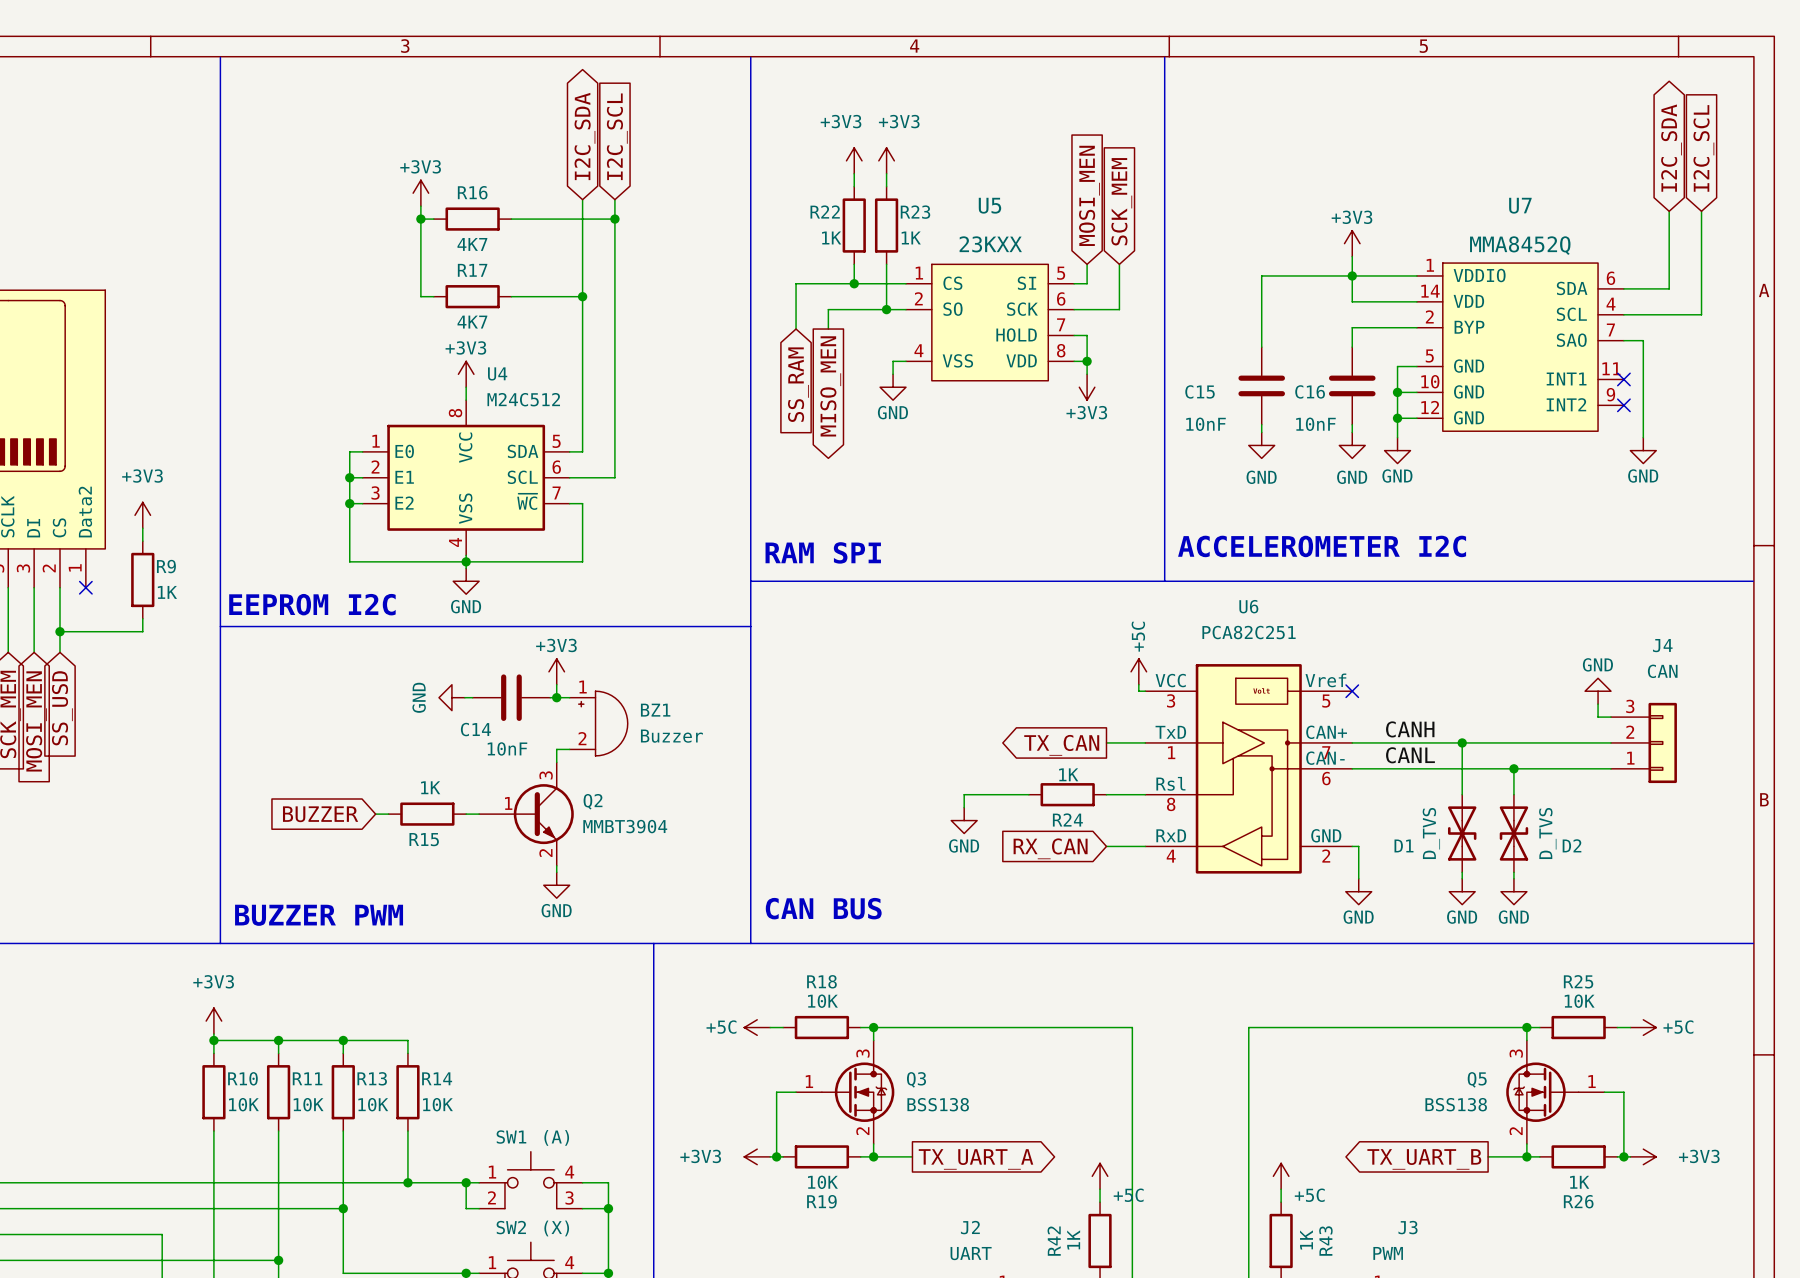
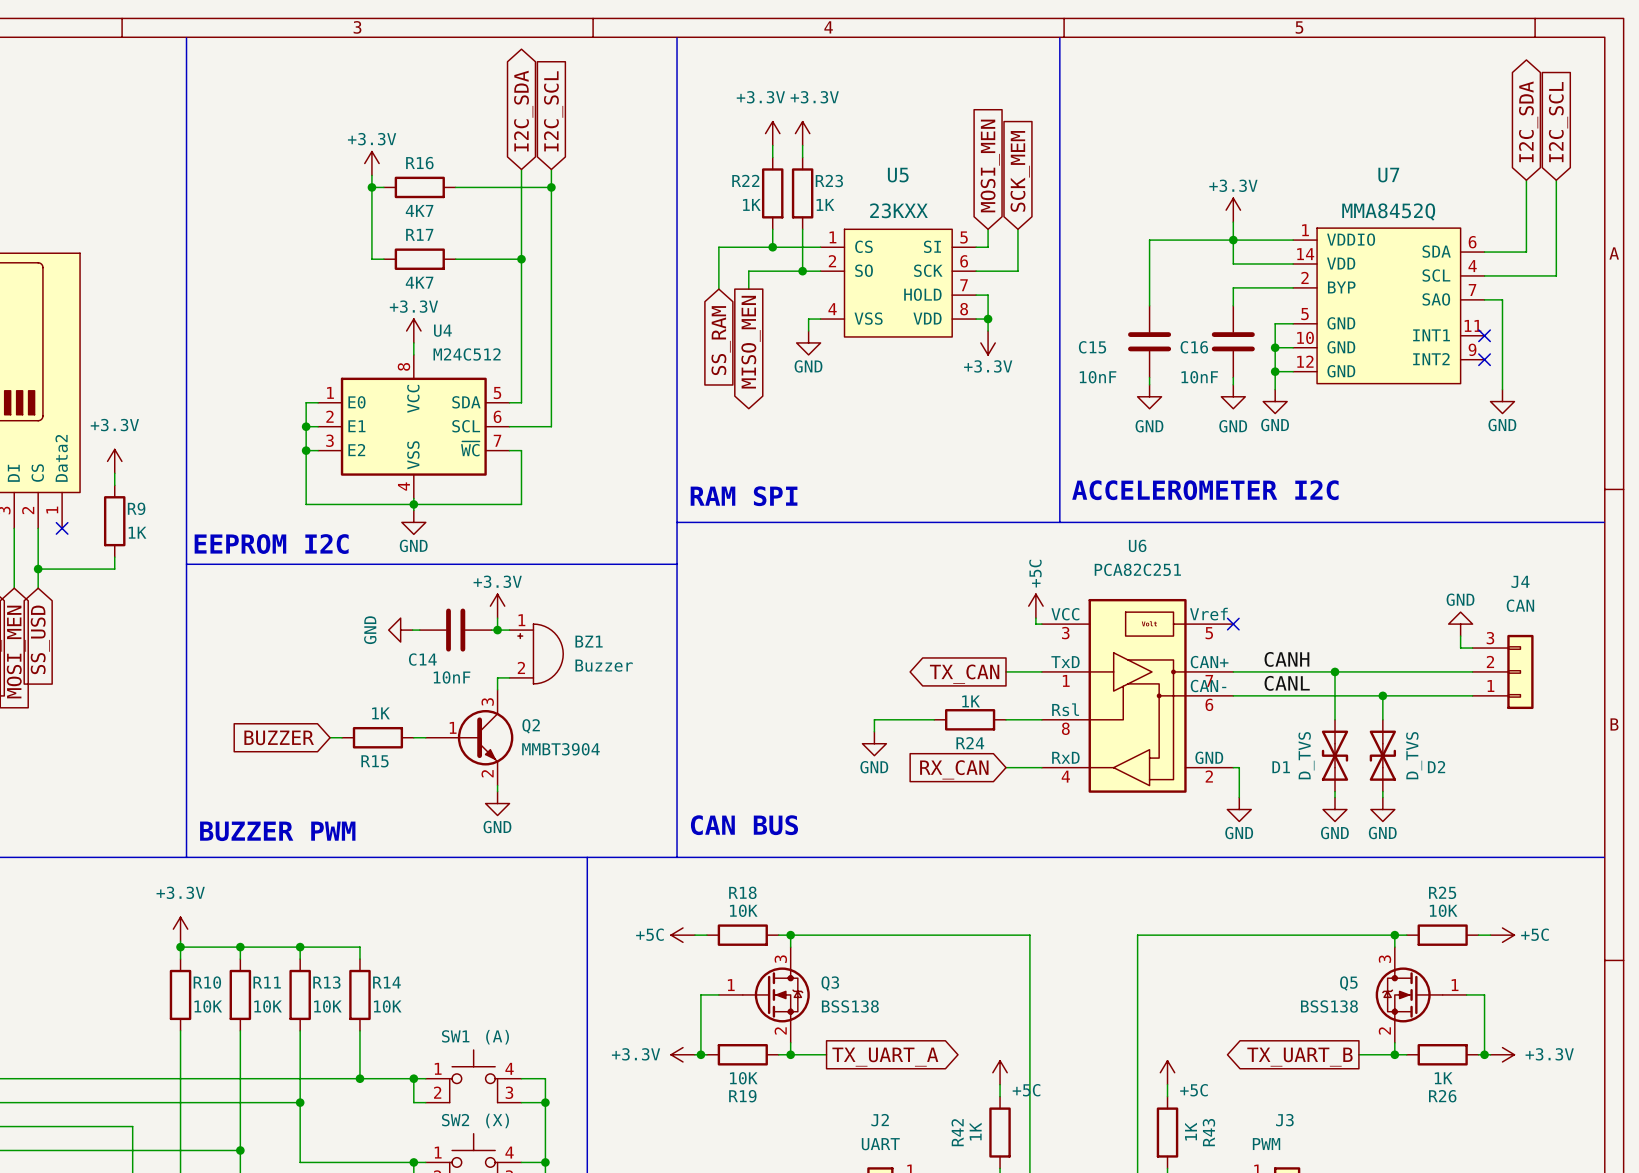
power symbol: +3V3 (854, 160) -> +3.3V (772, 133)
power symbol: +3V3 (886, 160) -> +3.3V (802, 133)
power symbol: +3V3 (420, 193) -> +3.3V (371, 163)
power symbol: +3V3 (1352, 243) -> +3.3V (1233, 210)
power symbol: +3V3 (466, 374) -> +3.3V (413, 330)
power symbol: +3V3 (1087, 387) -> +3.3V (988, 342)
power symbol: +3V3 (142, 515) -> +3.3V (114, 461)
power symbol: +3V3 (556, 671) -> +3.3V (497, 606)
power symbol: +3V3 (213, 1021) -> +3.3V (180, 929)
power symbol: +3V3 (757, 1156) -> +3.3V (682, 1054)
power symbol: +3V3 (1643, 1156) -> +3.3V (1502, 1054)

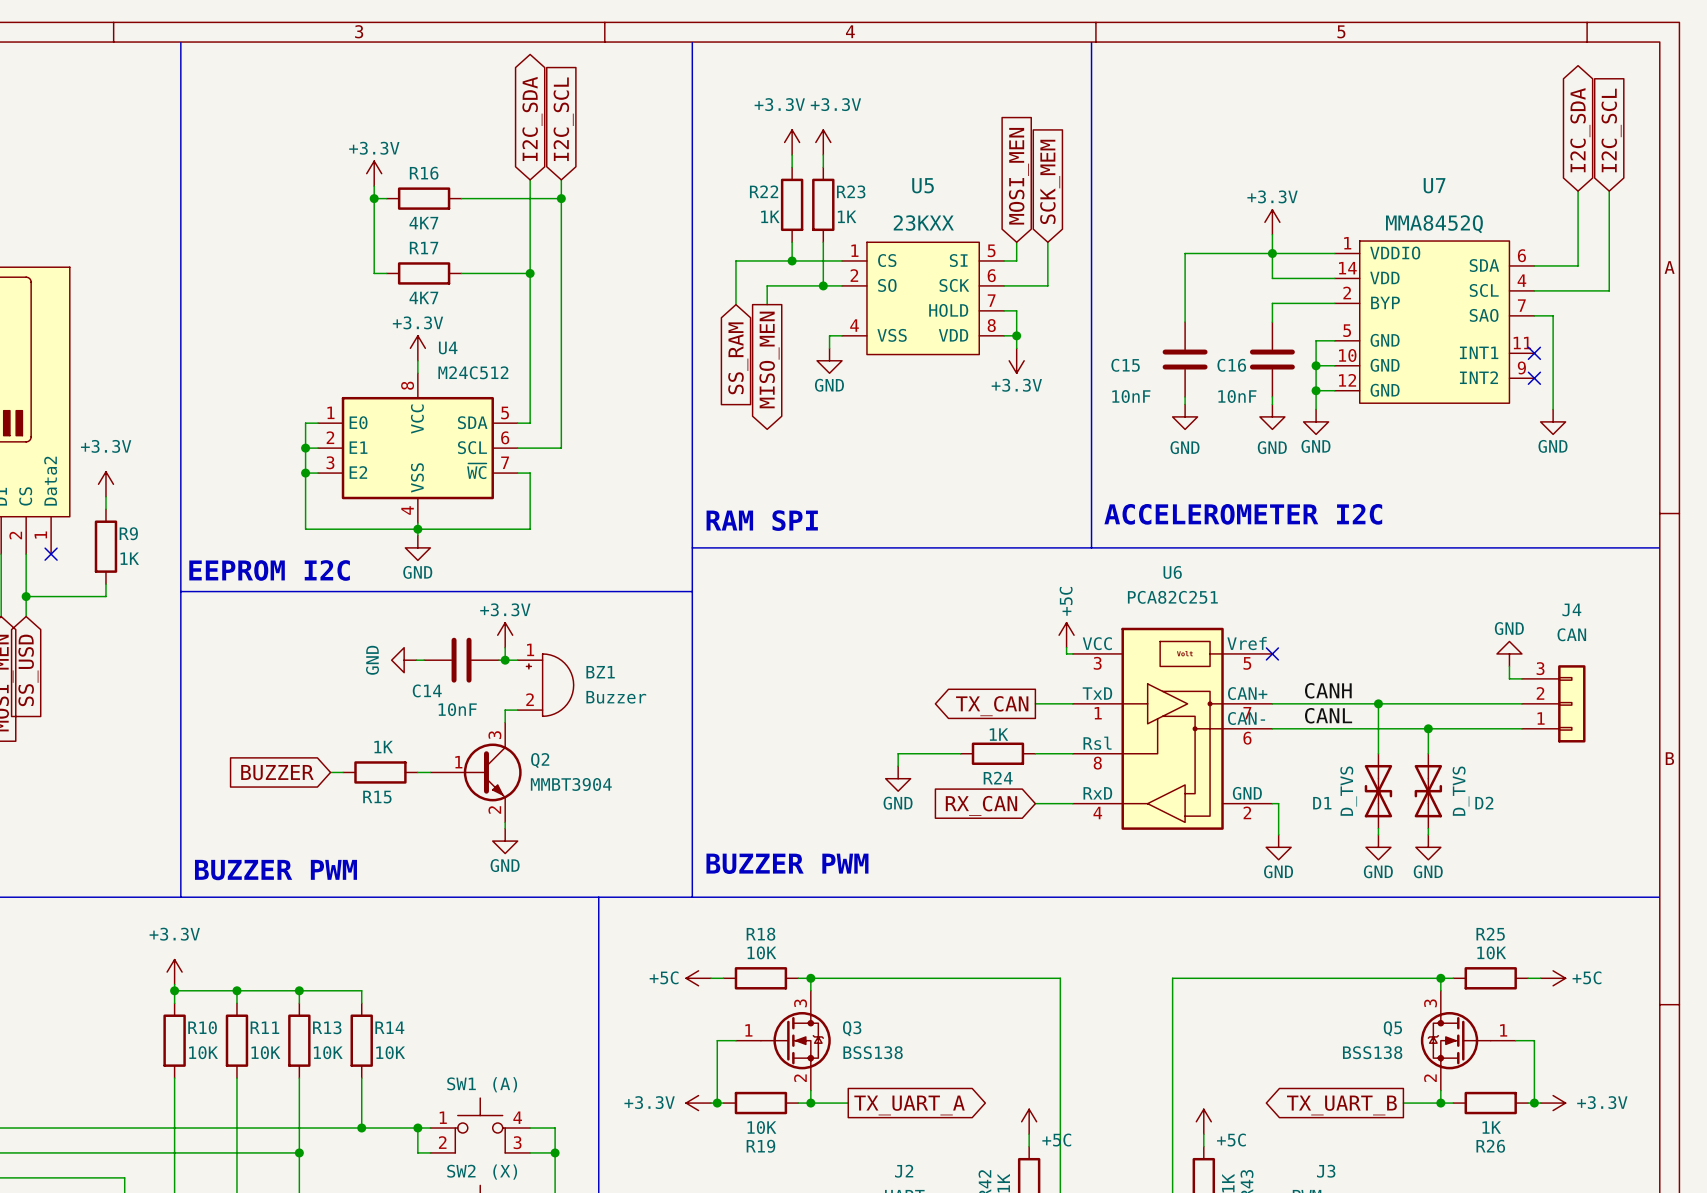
text: CAN BUS (744, 825) -> BUZZER PWM (787, 863)

